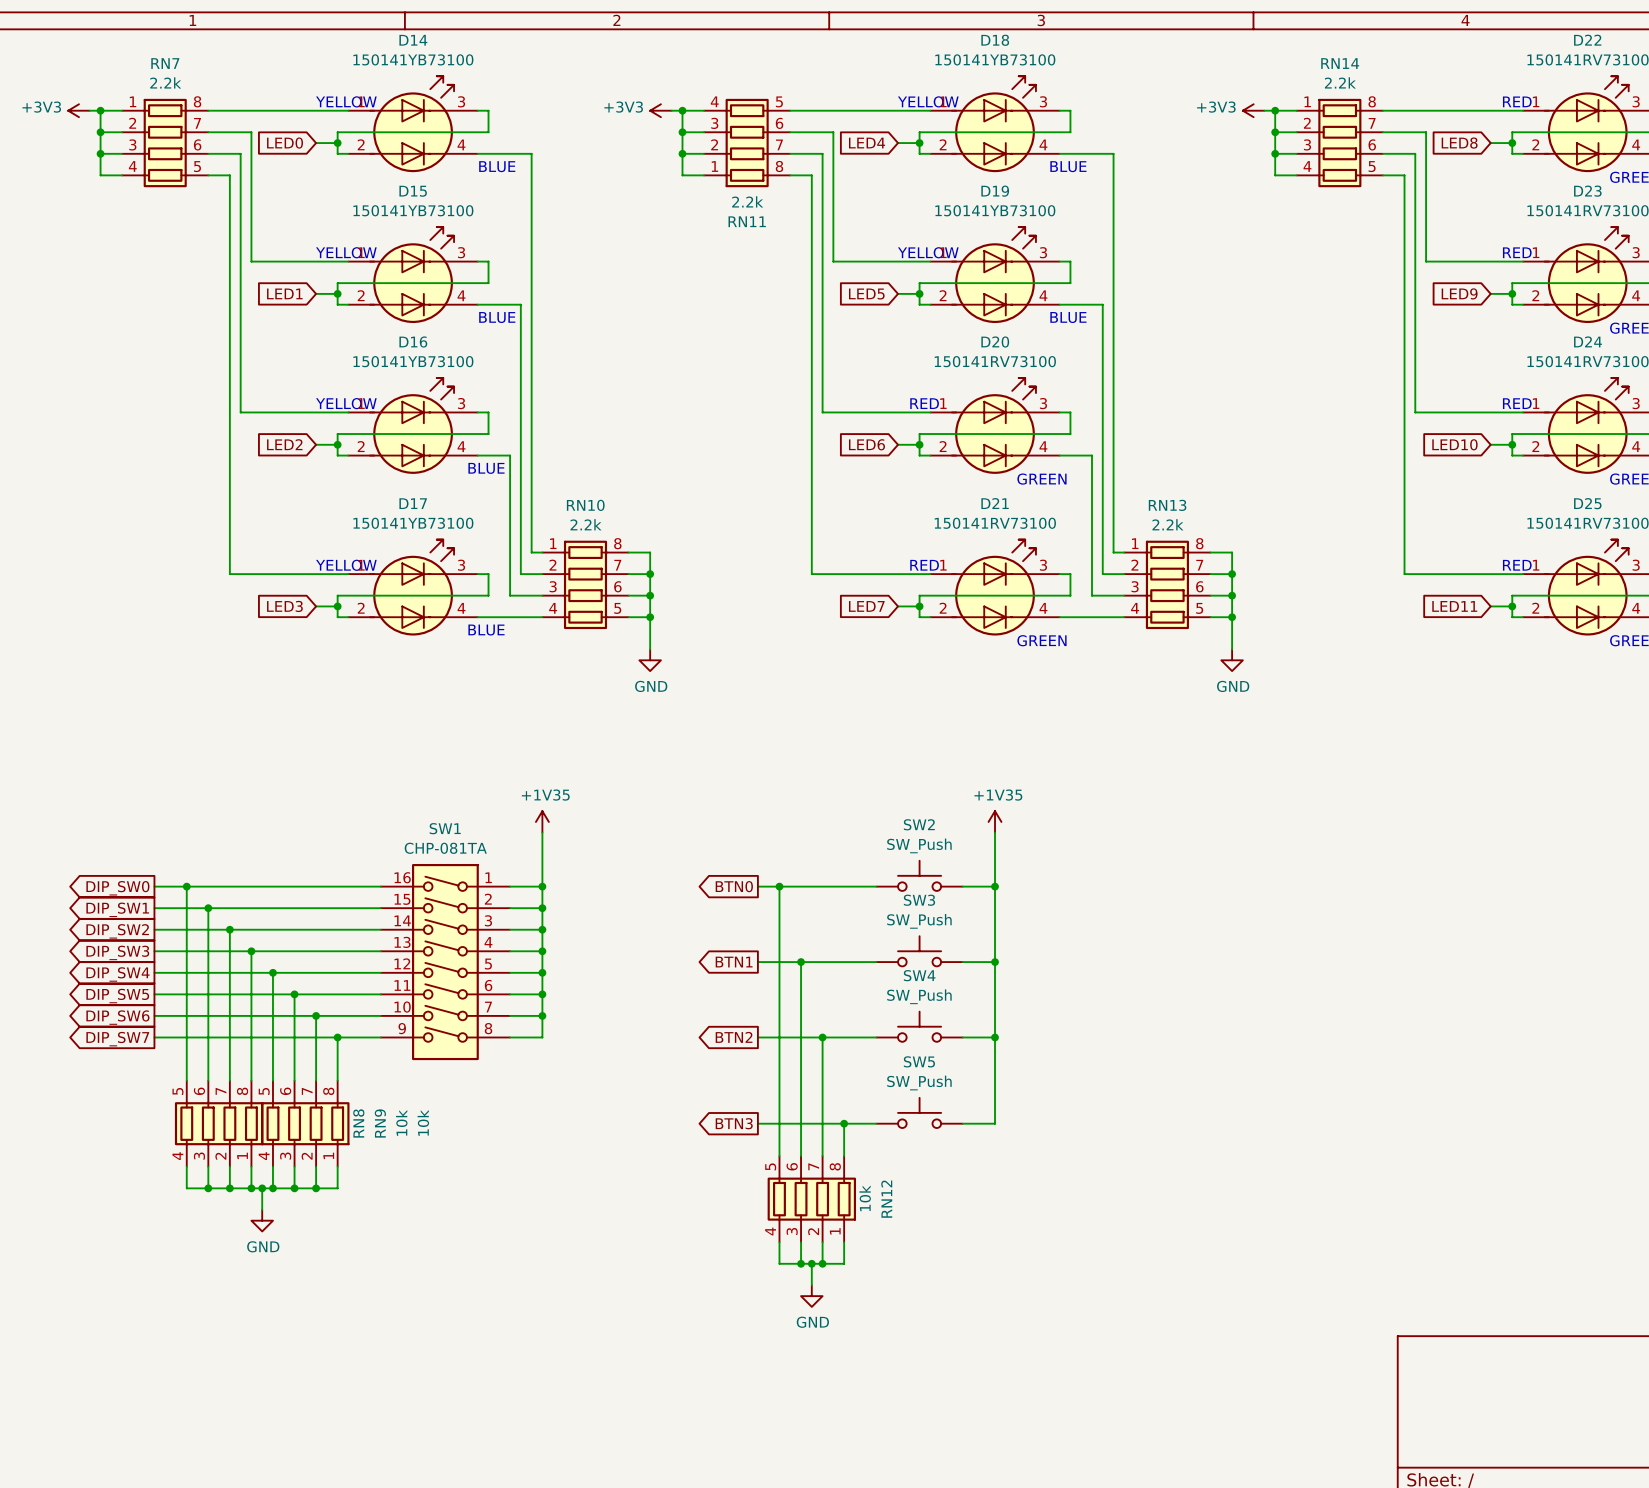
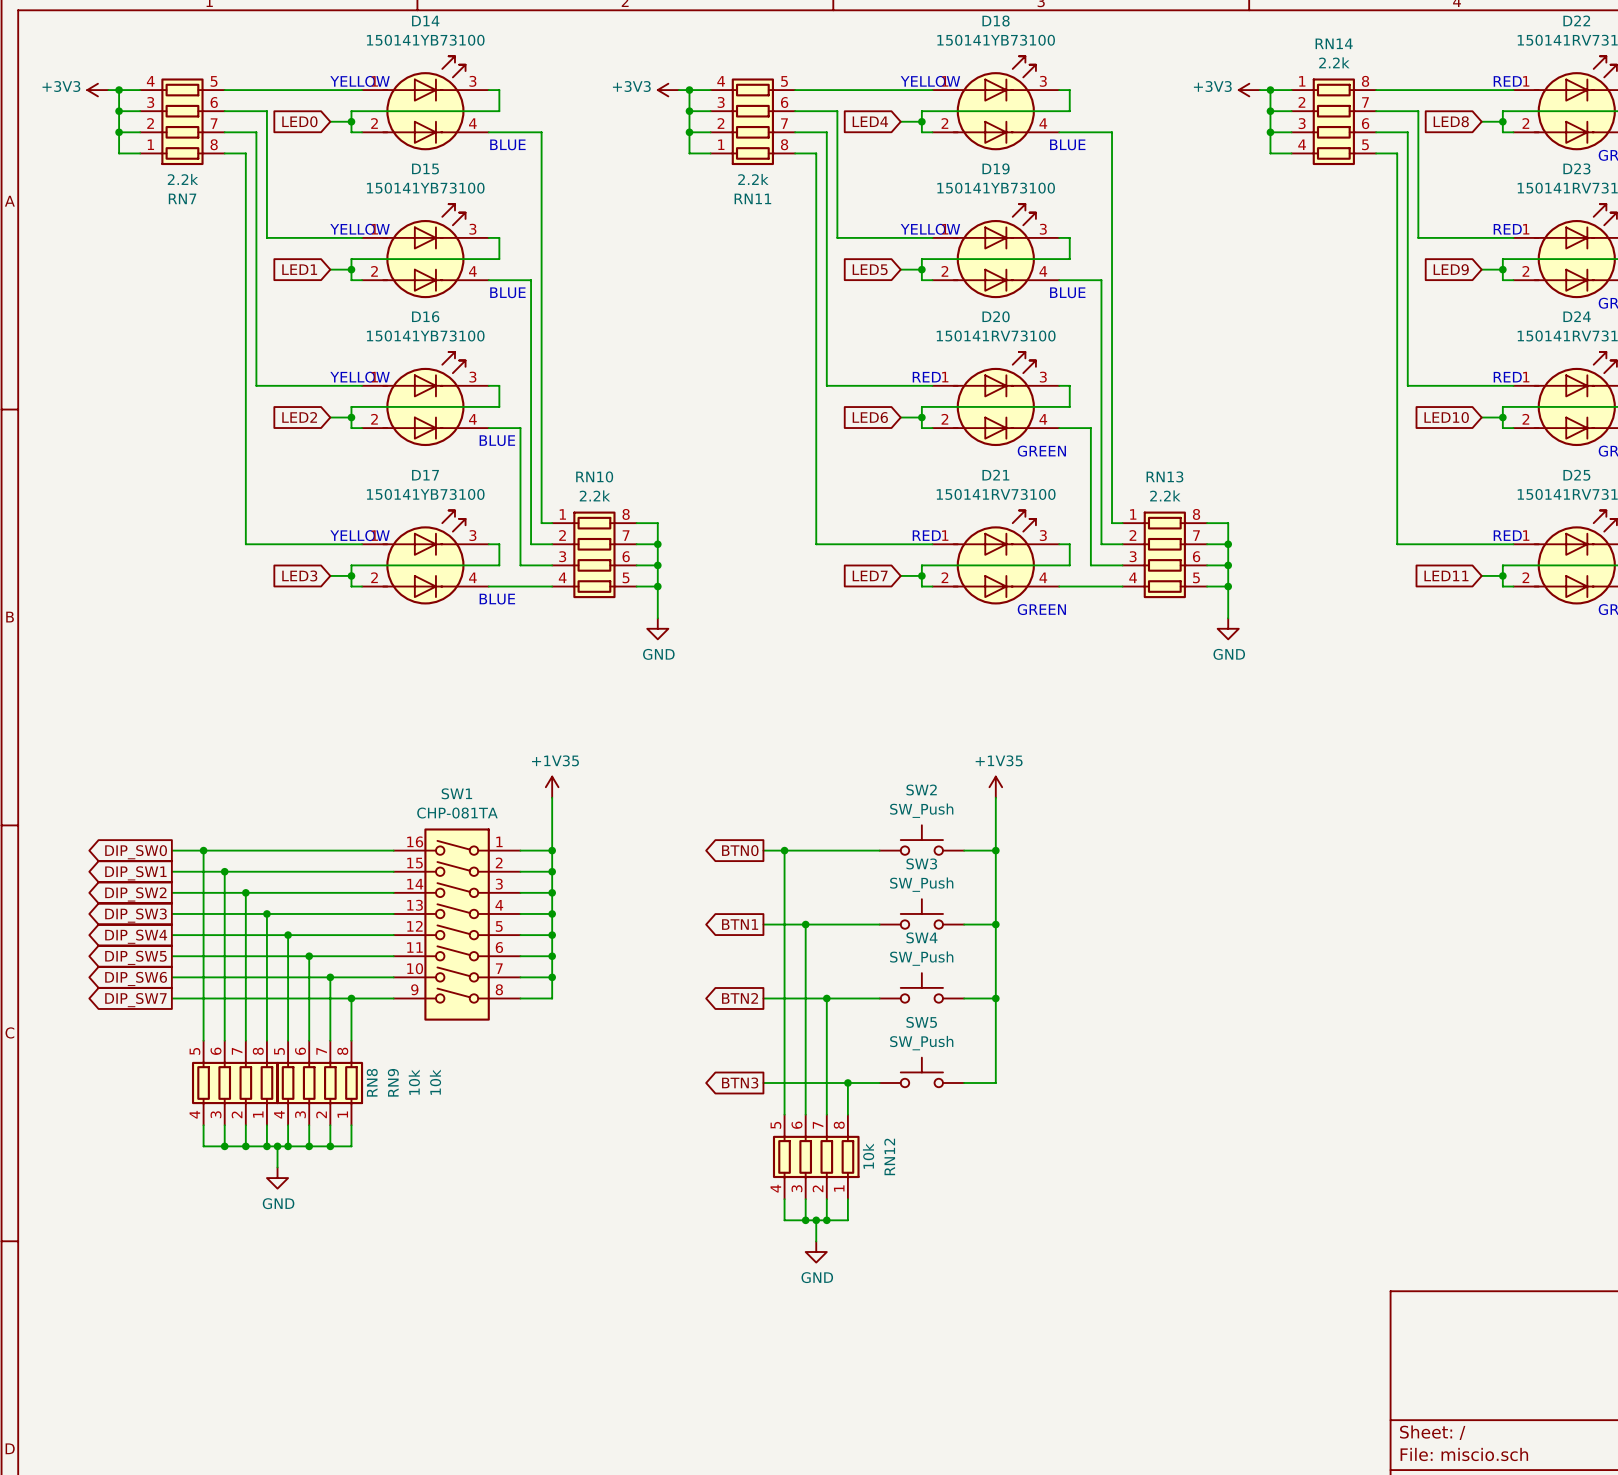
RN7 flip: as is (165, 143) -> up-down (182, 121)

